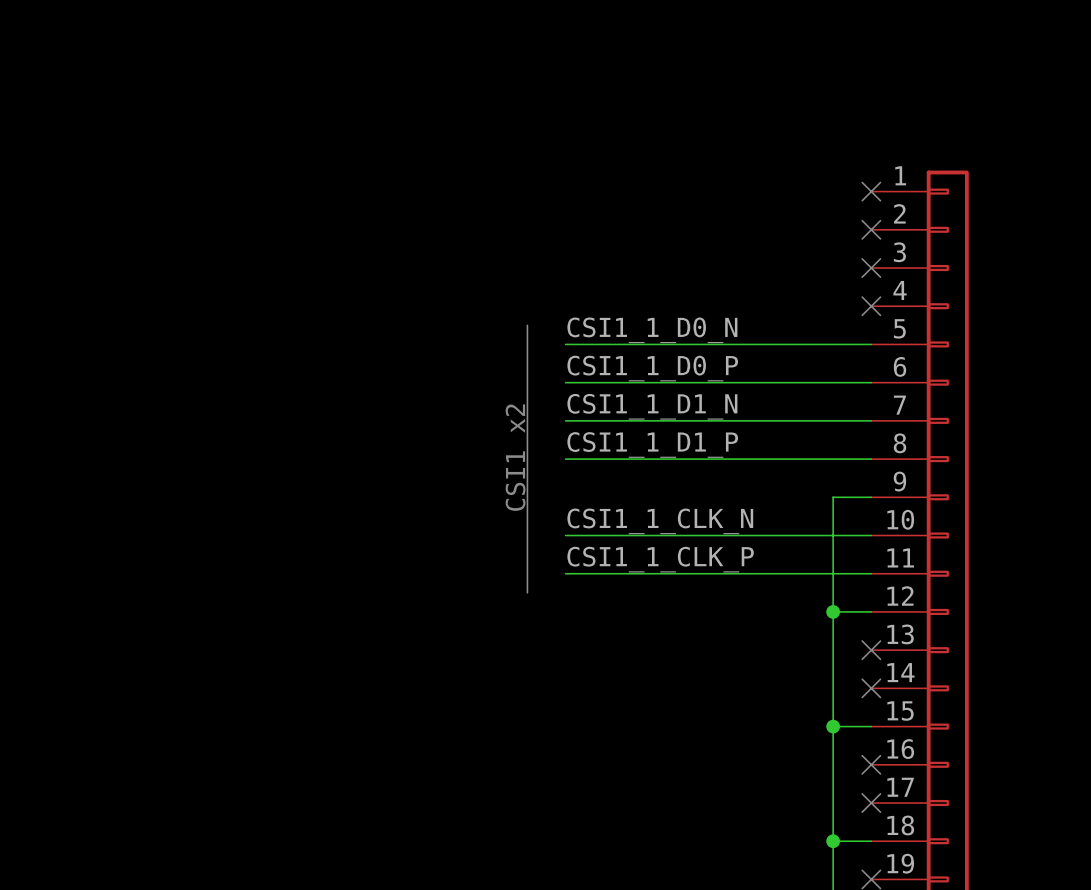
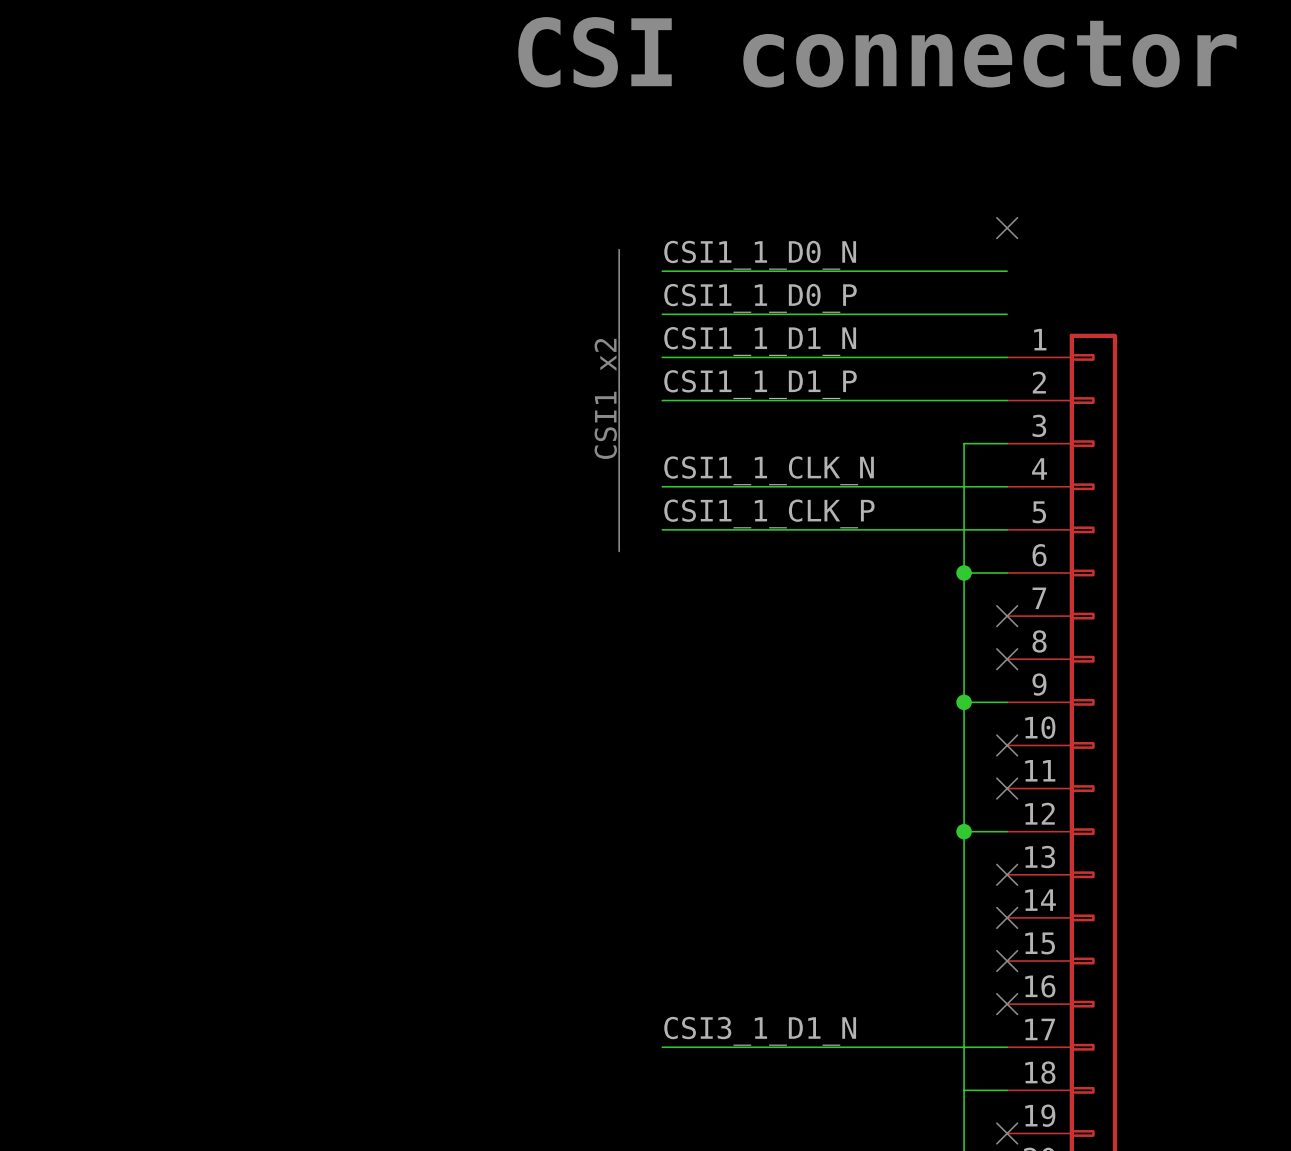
no-connect mark: none -> (1007, 228)
label: none -> CSI1_1_D0_N (760, 255)
wire: none -> (662, 271) (1007, 271)
wire: none -> (662, 314) (1007, 314)
no-connect mark: (871, 191) -> none
no-connect mark: (871, 229) -> none
wire: none -> (1007, 443) (964, 443) (964, 702)
no-connect mark: (871, 268) -> none
no-connect mark: (871, 306) -> none
label: CSI1_1_D0_N (652, 330) -> CSI1_1_CLK_P (769, 513)
line: (527, 363) (527, 592) -> (619, 249) (619, 508)
label position: CSI1_1_D0_P (652, 368) -> CSI1_1_D0_P (760, 298)
wire: (565, 382) (833, 382) -> none
junction: none -> (964, 572)
label position: CSI1_1_D1_N (652, 406) -> CSI1_1_D1_N (760, 341)
wire: (565, 420) (871, 420) -> (662, 357) (1007, 357)
no-connect mark: none -> (1007, 616)
label position: CSI1_1_D1_P (652, 444) -> CSI1_1_D1_P (760, 384)
text position: CSI1 x2 (515, 457) -> CSI1 x2 (605, 398)
wire: (565, 459) (871, 459) -> (662, 400) (1007, 400)
no-connect mark: none -> (1007, 659)
junction: none -> (964, 702)
label position: CSI1_1_CLK_N (660, 521) -> CSI1_1_CLK_N (769, 470)
wire: (565, 535) (871, 535) -> (662, 486) (1007, 486)
no-connect mark: none -> (1007, 745)
label: CSI1_1_CLK_P (660, 559) -> none
wire: (565, 573) (871, 573) -> (662, 1047) (1007, 1047)
no-connect mark: none -> (1007, 788)
wire: (833, 726) (871, 726) -> none
junction: (833, 726) -> none
label: none -> CSI3_1_D1_N (760, 1031)
no-connect mark position: (871, 803) -> (1007, 961)
junction: (833, 841) -> none

